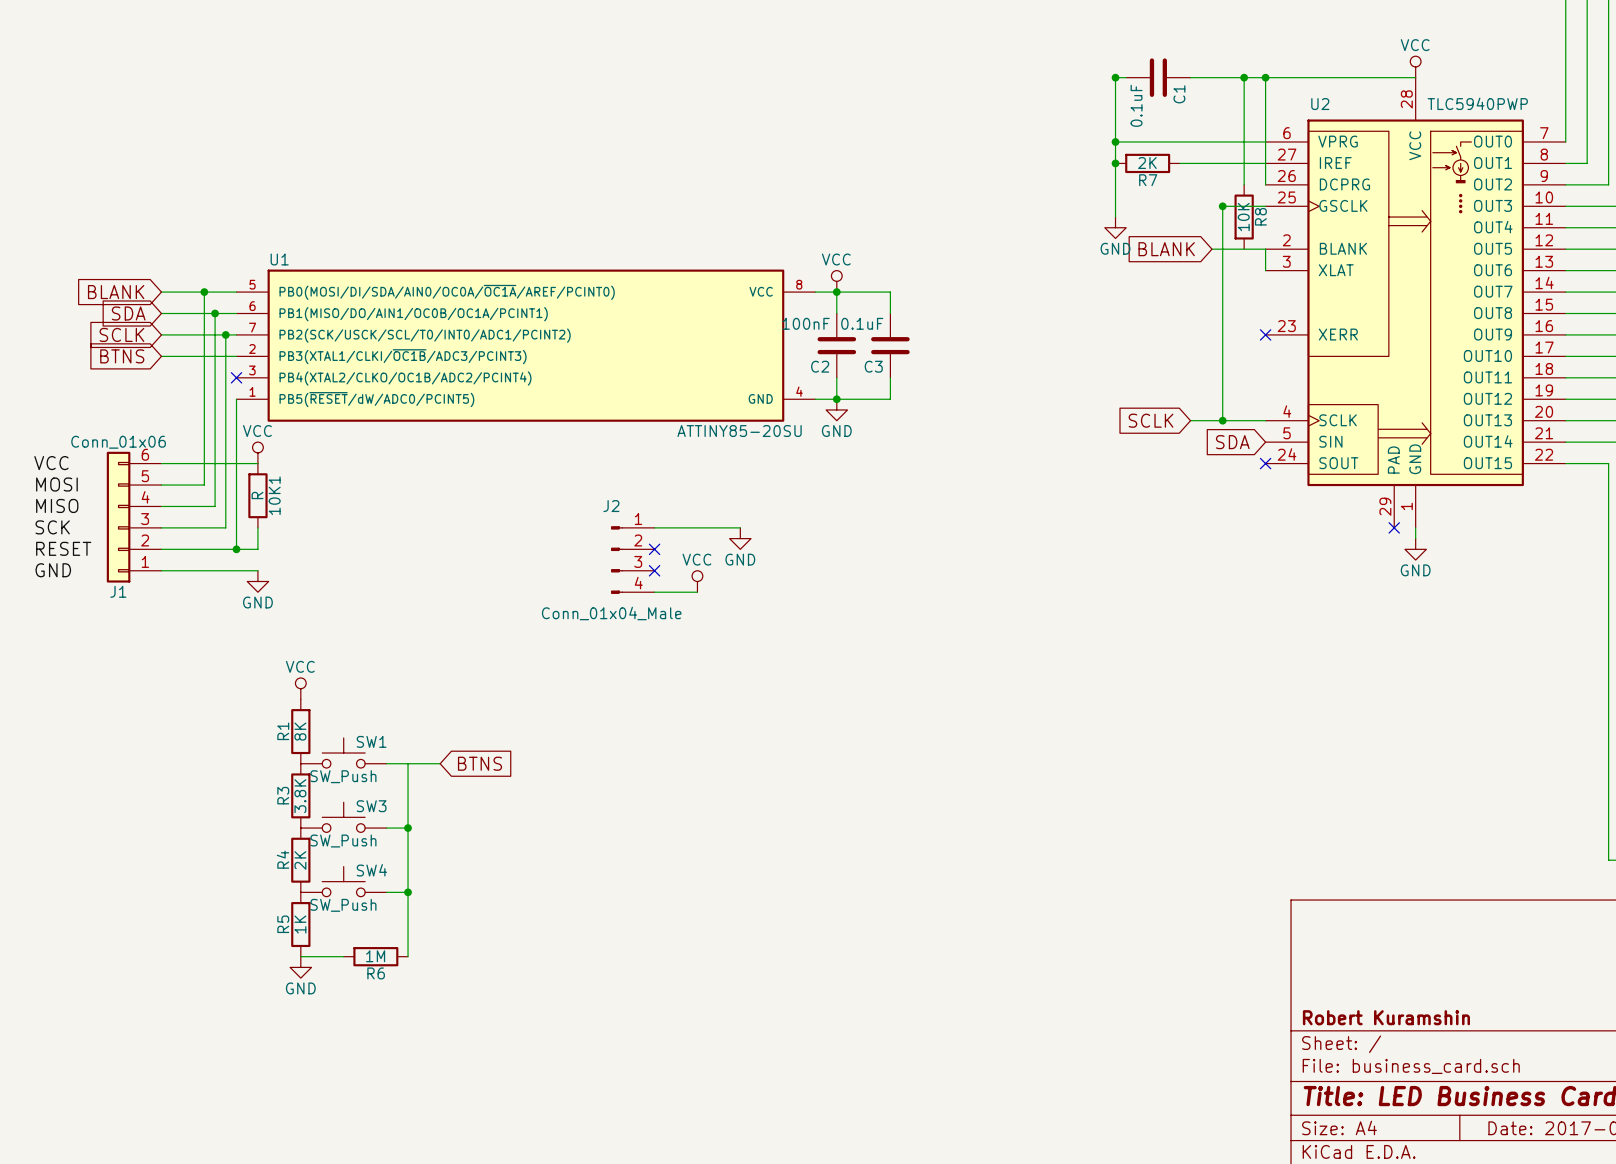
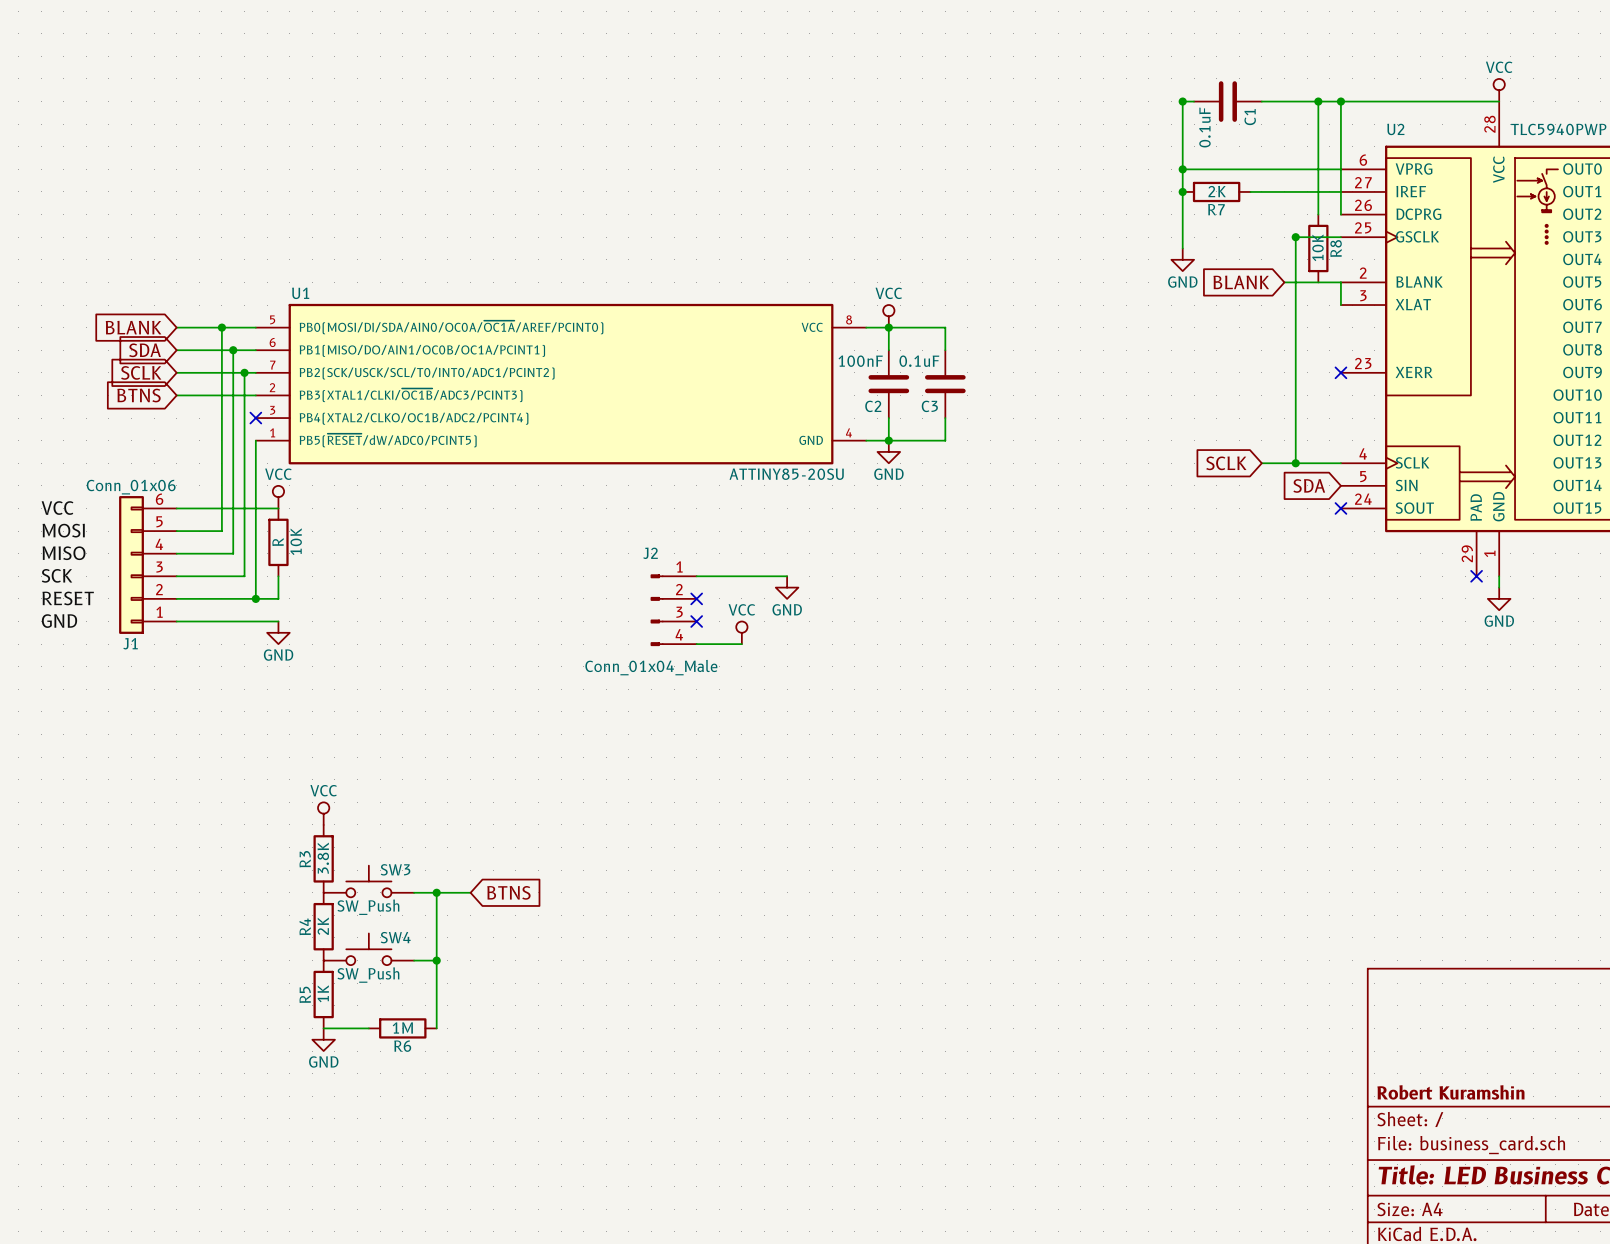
10K1 name: 10K1 (274, 495) -> 10K (296, 541)
power symbol position: VCC (300, 688) -> VCC (323, 813)
R1: 8K (300, 731) -> none
SW1: SW_Push (343, 753) -> none
wire: (386, 763) (440, 763) -> none
wire: (408, 763) (408, 828) -> (470, 892) (436, 892)
global label position: BTNS (479, 763) -> BTNS (508, 892)

